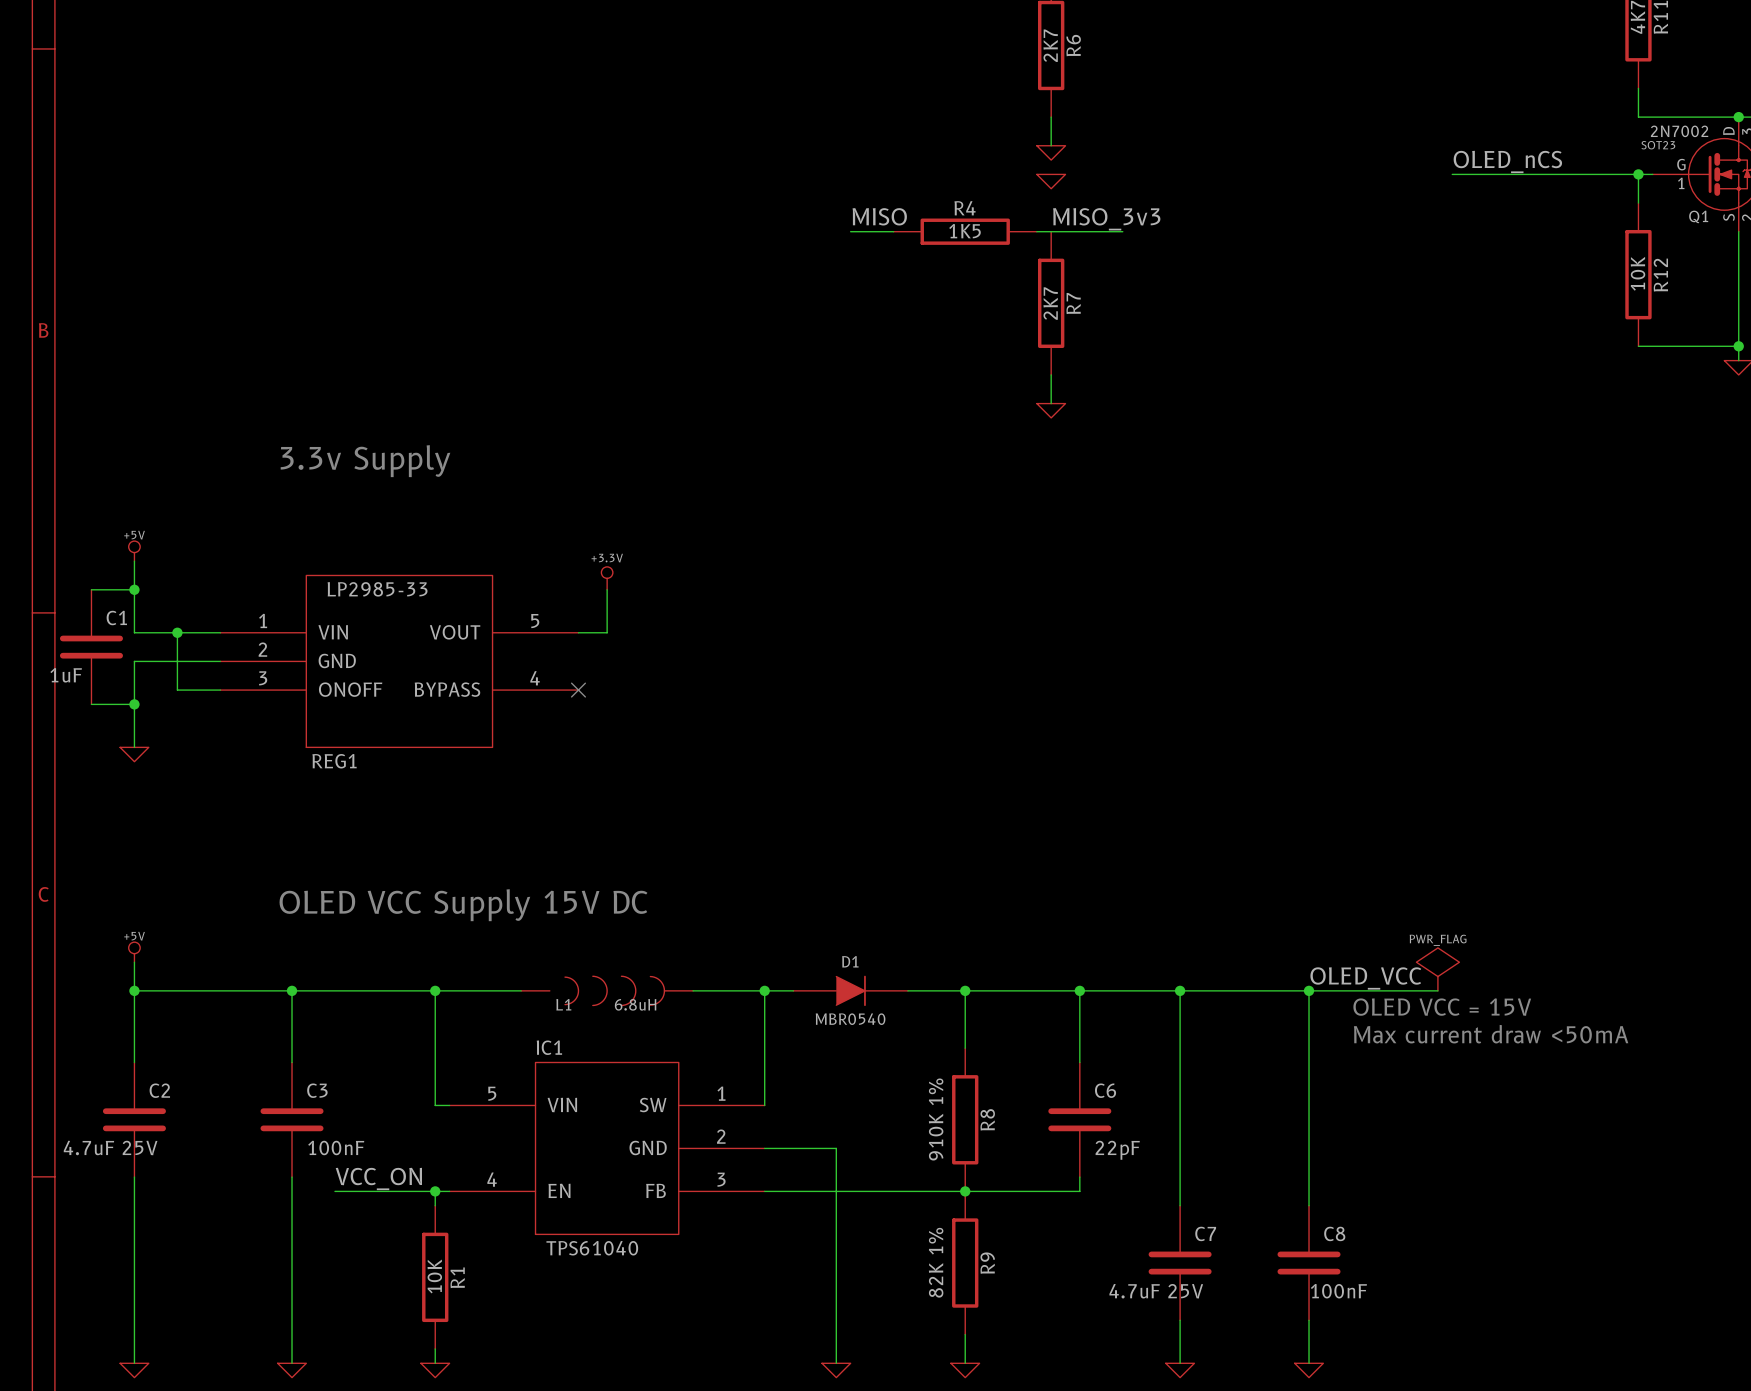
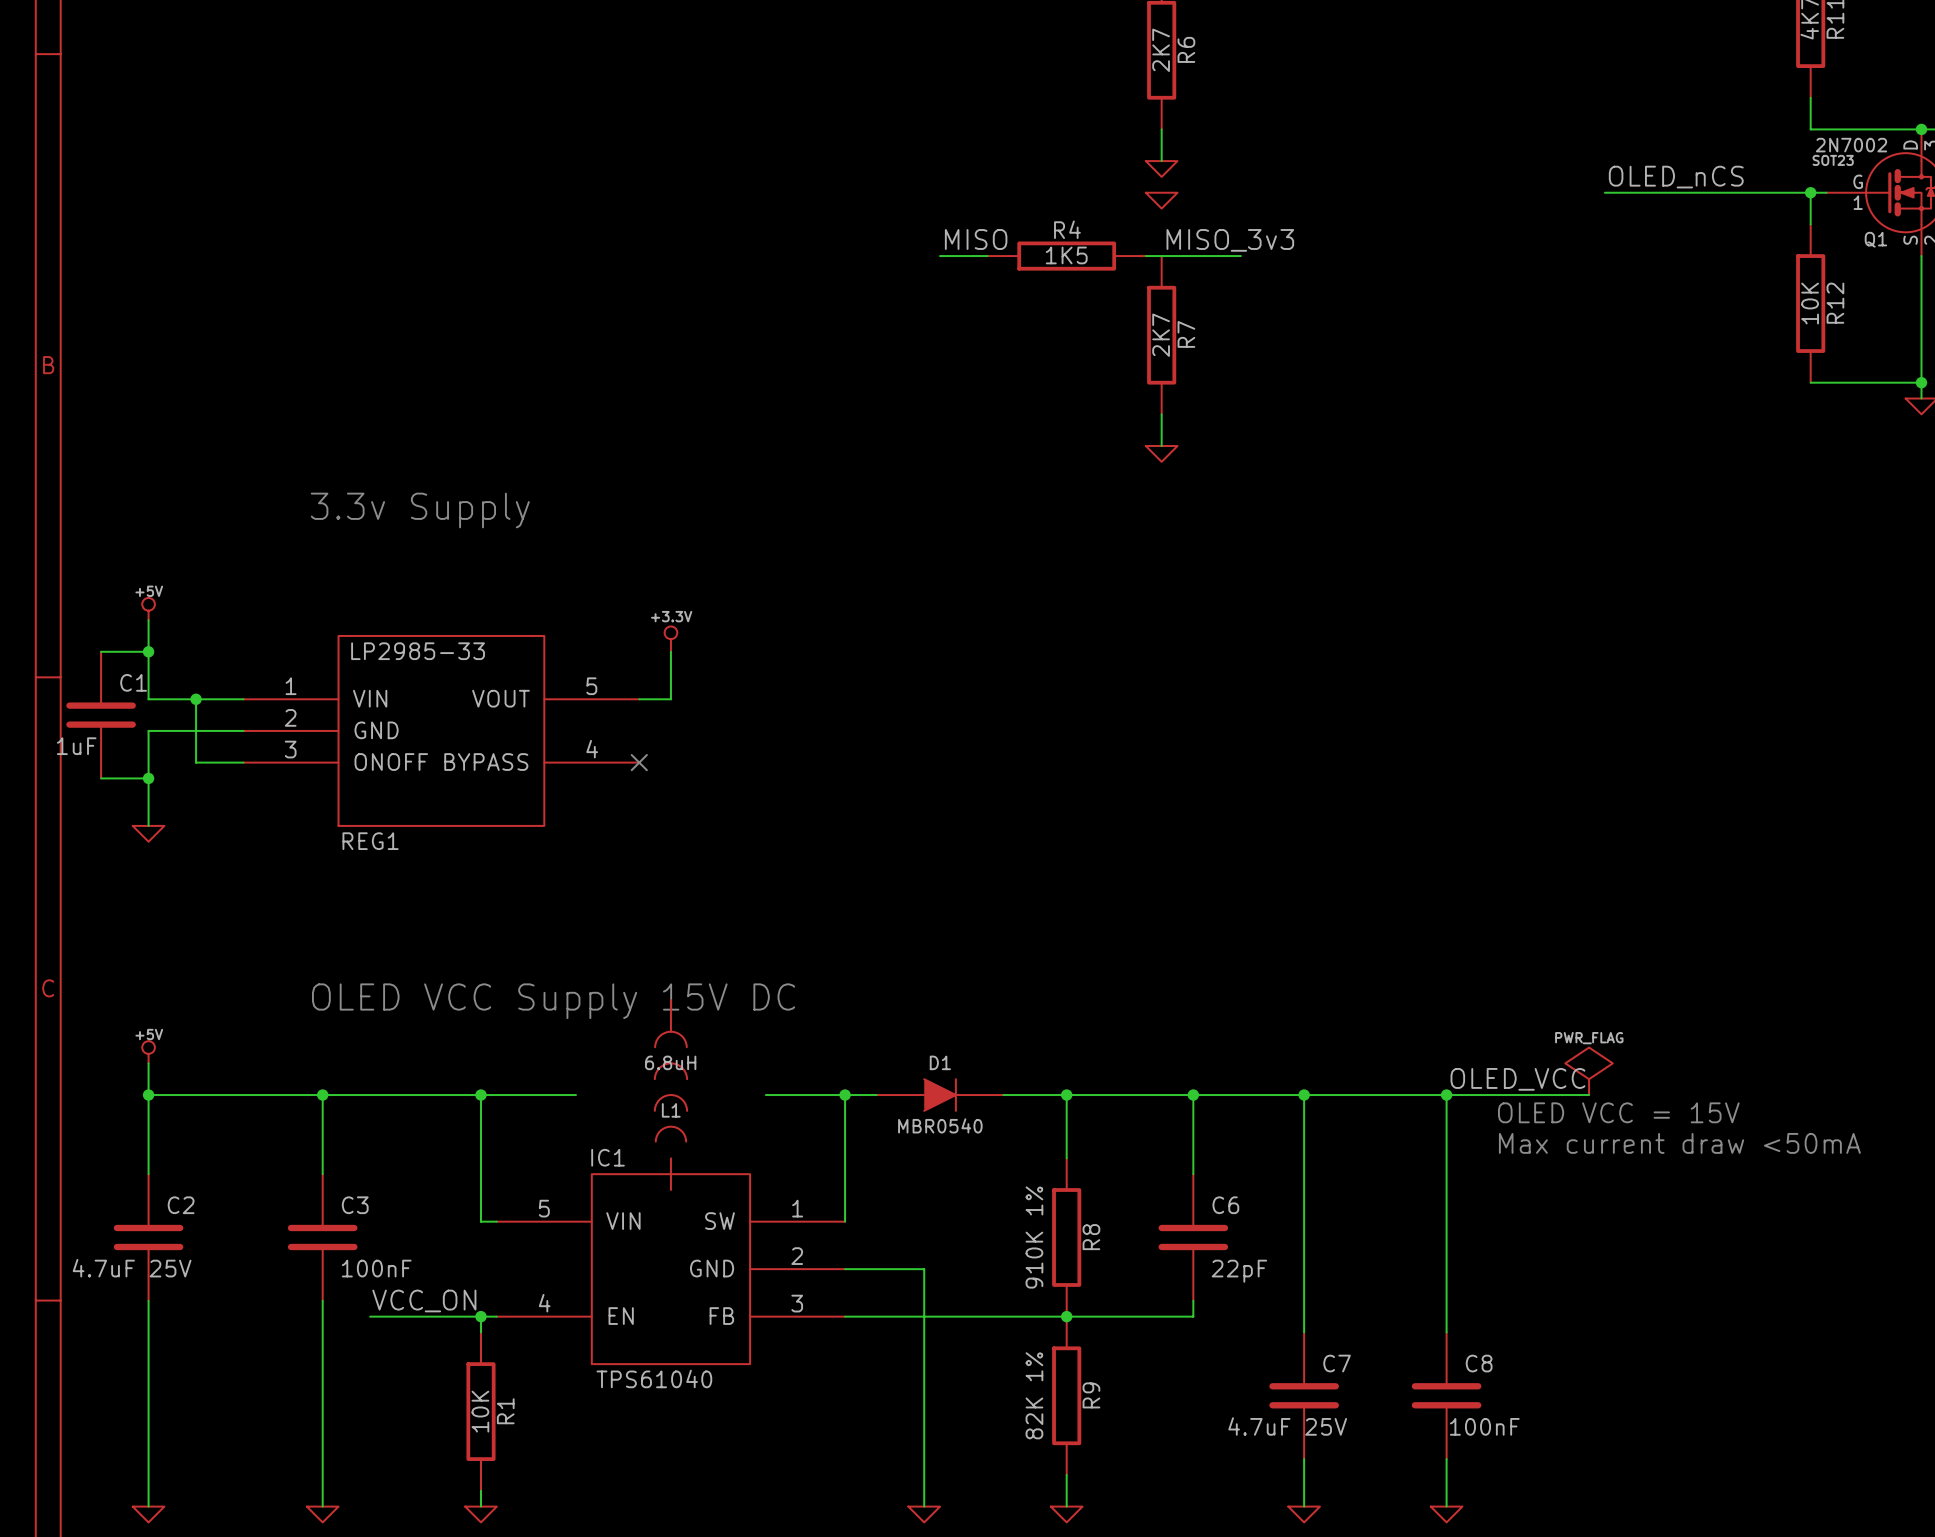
L1 rotation: 0° (614, 990) -> 90° counterclockwise (670, 1086)
L1 name position: L1 (563, 1004) -> L1 (671, 1110)

